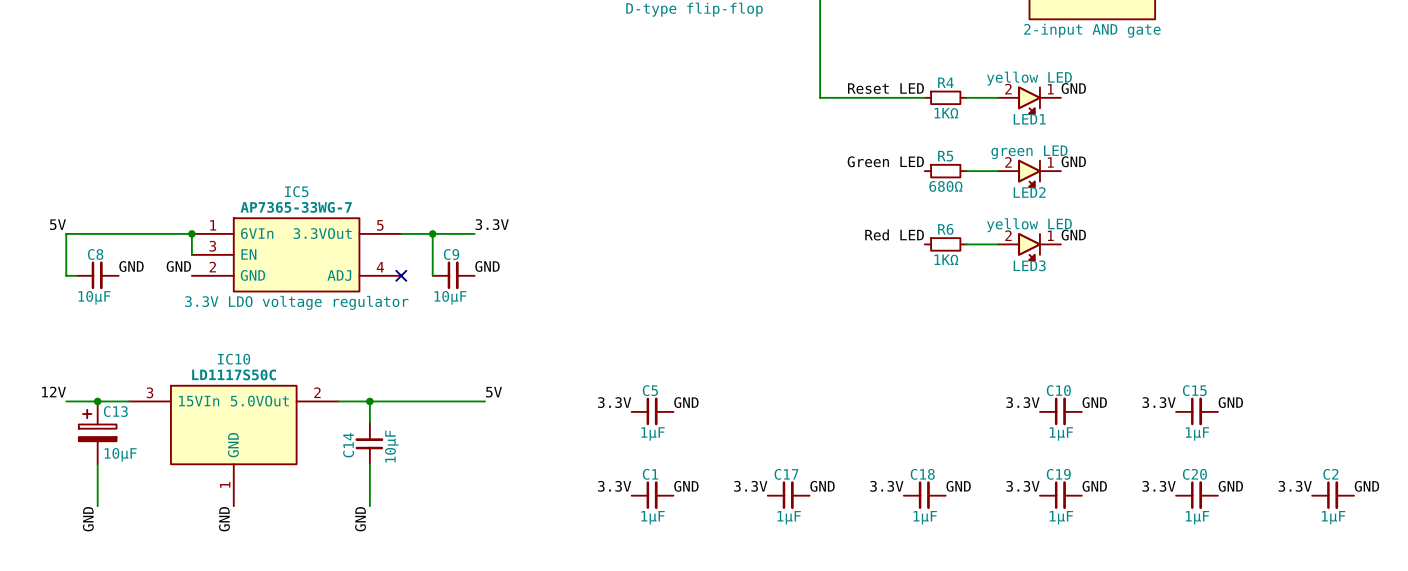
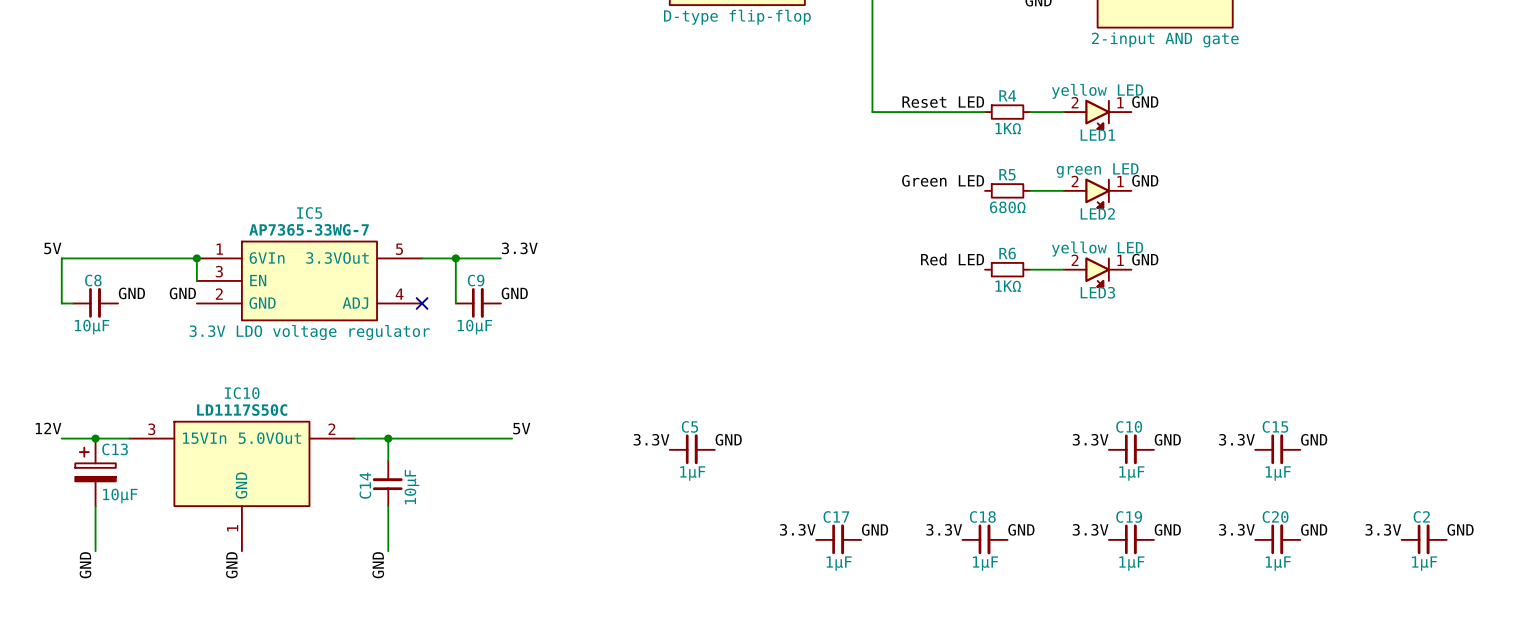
label: 3.3V (614, 486) -> none
label: GND (686, 486) -> none
C1: 1μF (652, 495) -> none

